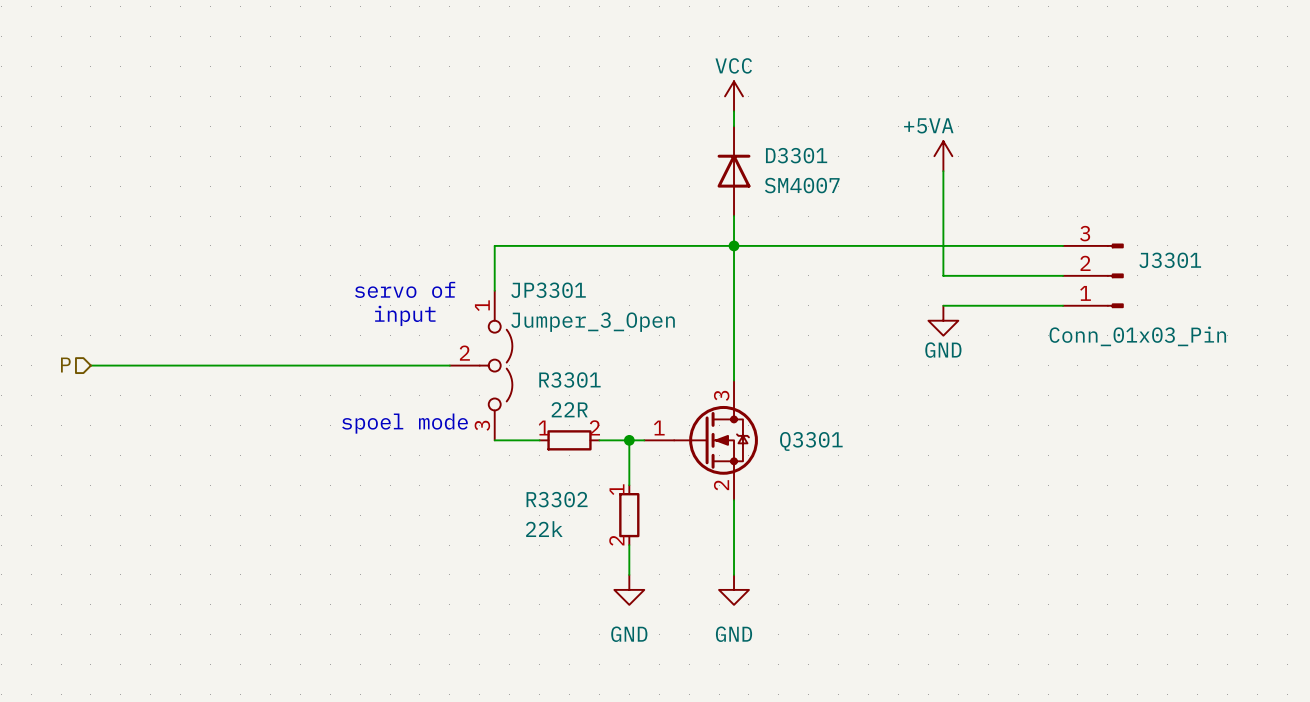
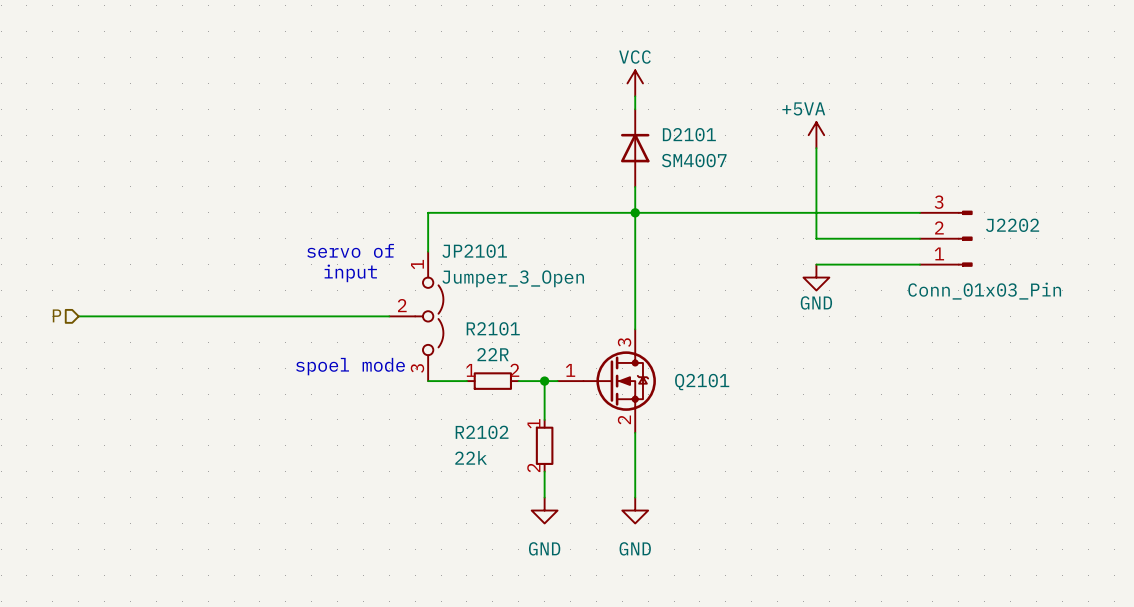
D3301 name: D3301 (796, 155) -> D2101 (689, 134)
J3301 name: J3301 (1170, 260) -> J2202 (1012, 225)
JP3301 name: JP3301 (548, 290) -> JP2101 (474, 251)
R3301 name: R3301 (569, 379) -> R2101 (493, 328)
Q3301 name: Q3301 (811, 441) -> Q2101 (702, 382)
R3302 name: R3302 (557, 499) -> R2102 (482, 432)

